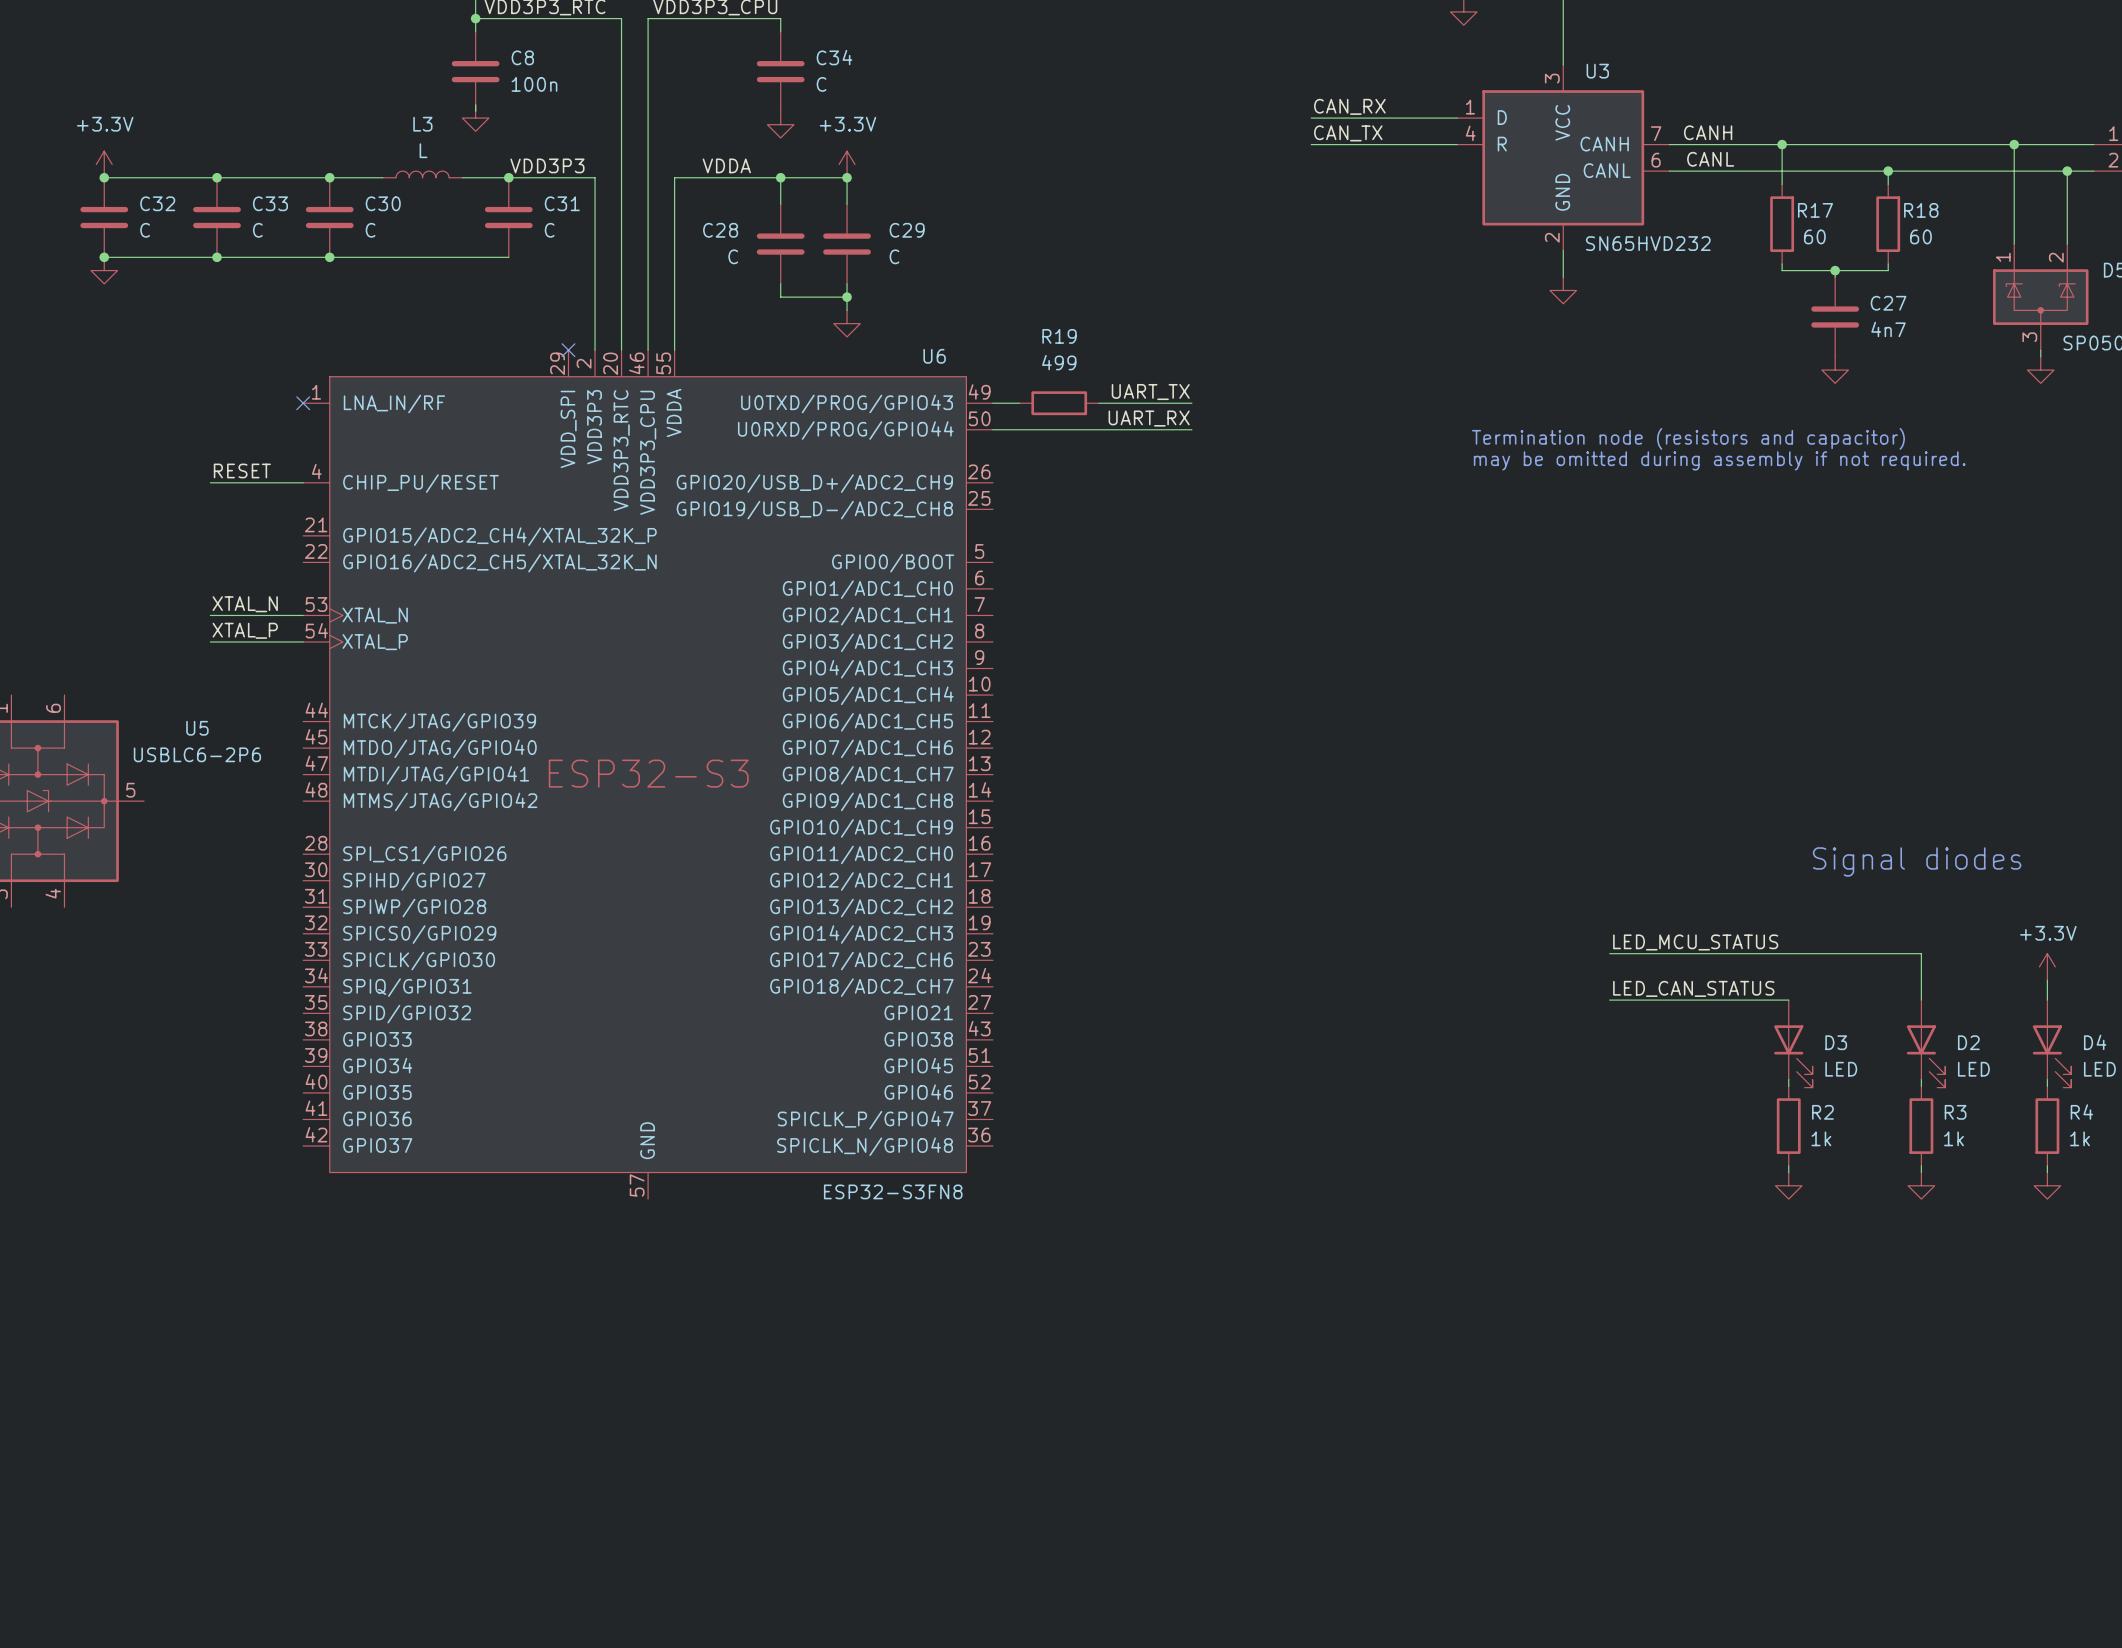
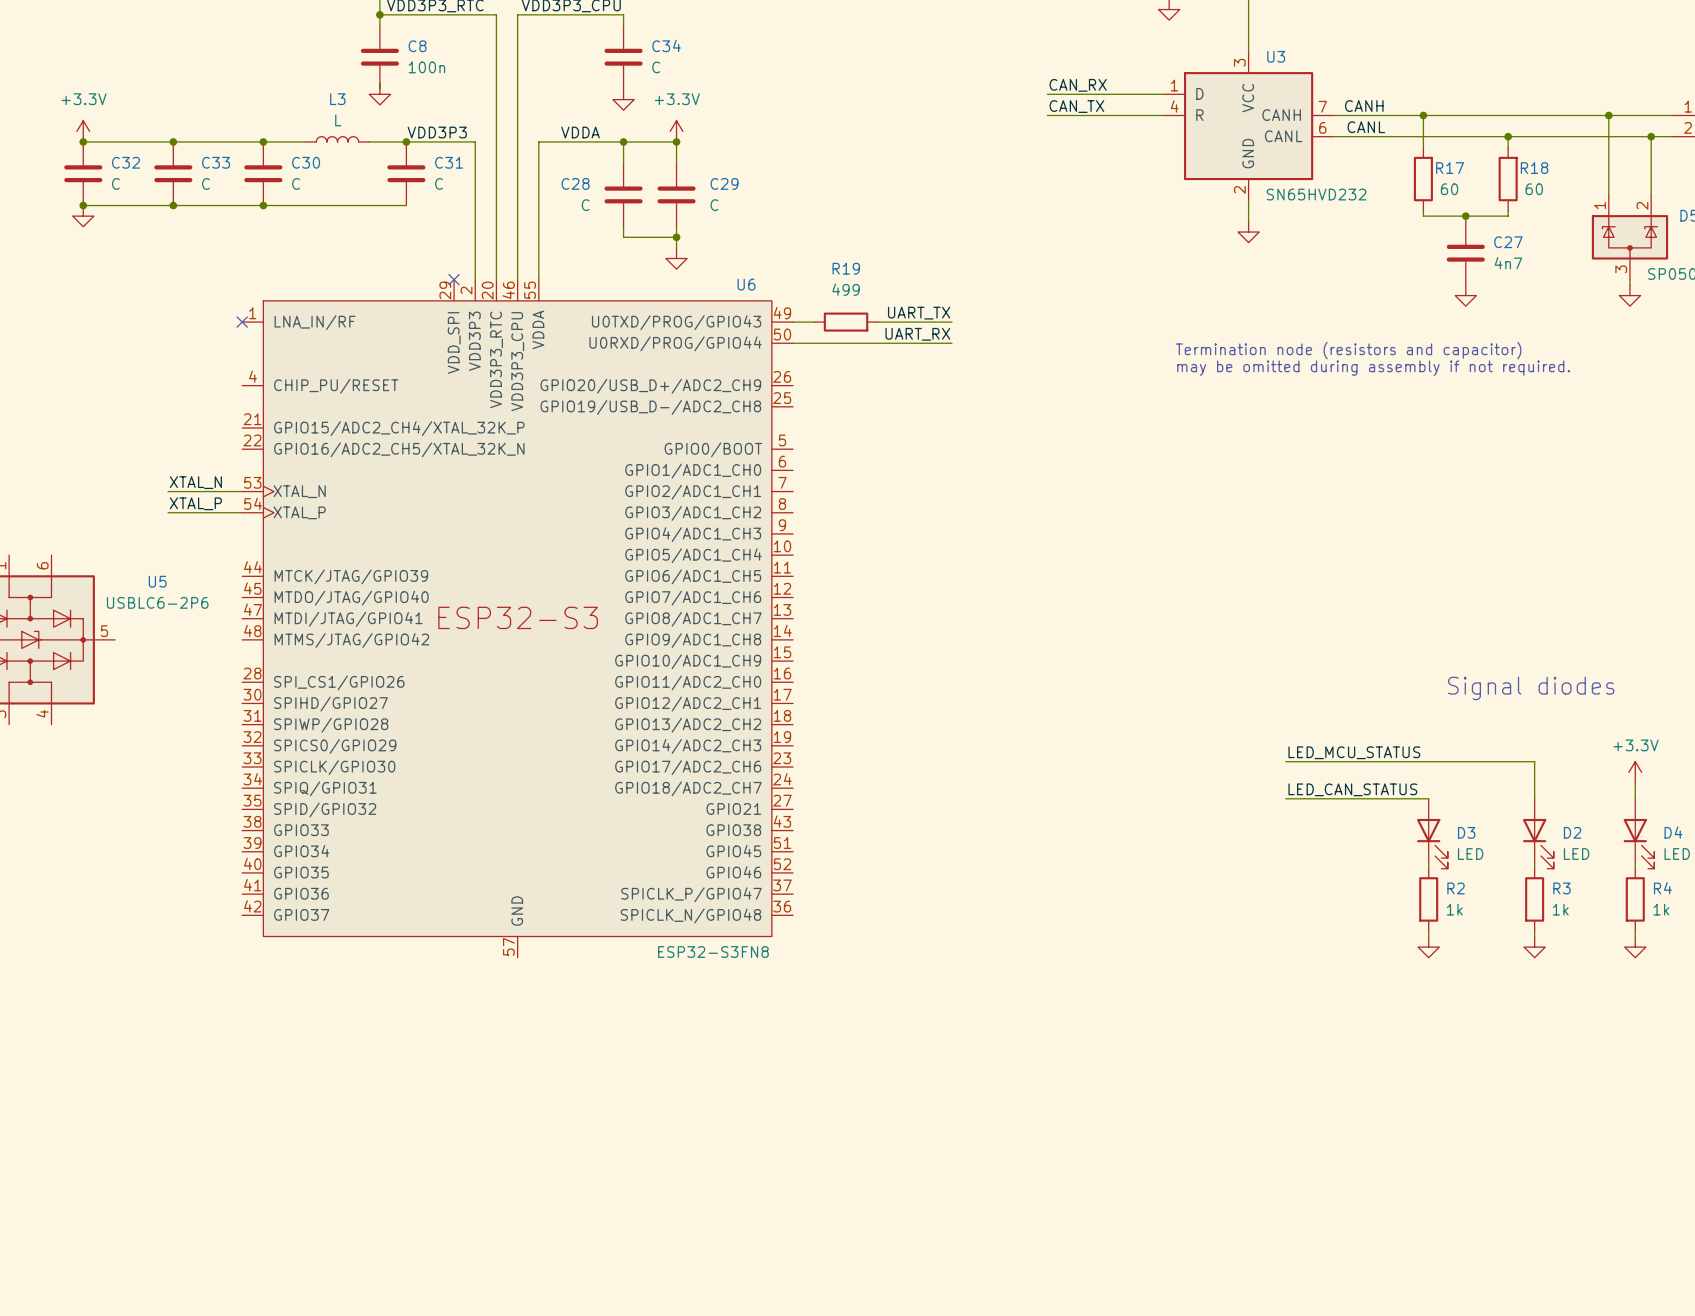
label: RESET (242, 470) -> none
wire: (210, 482) (303, 482) -> none

